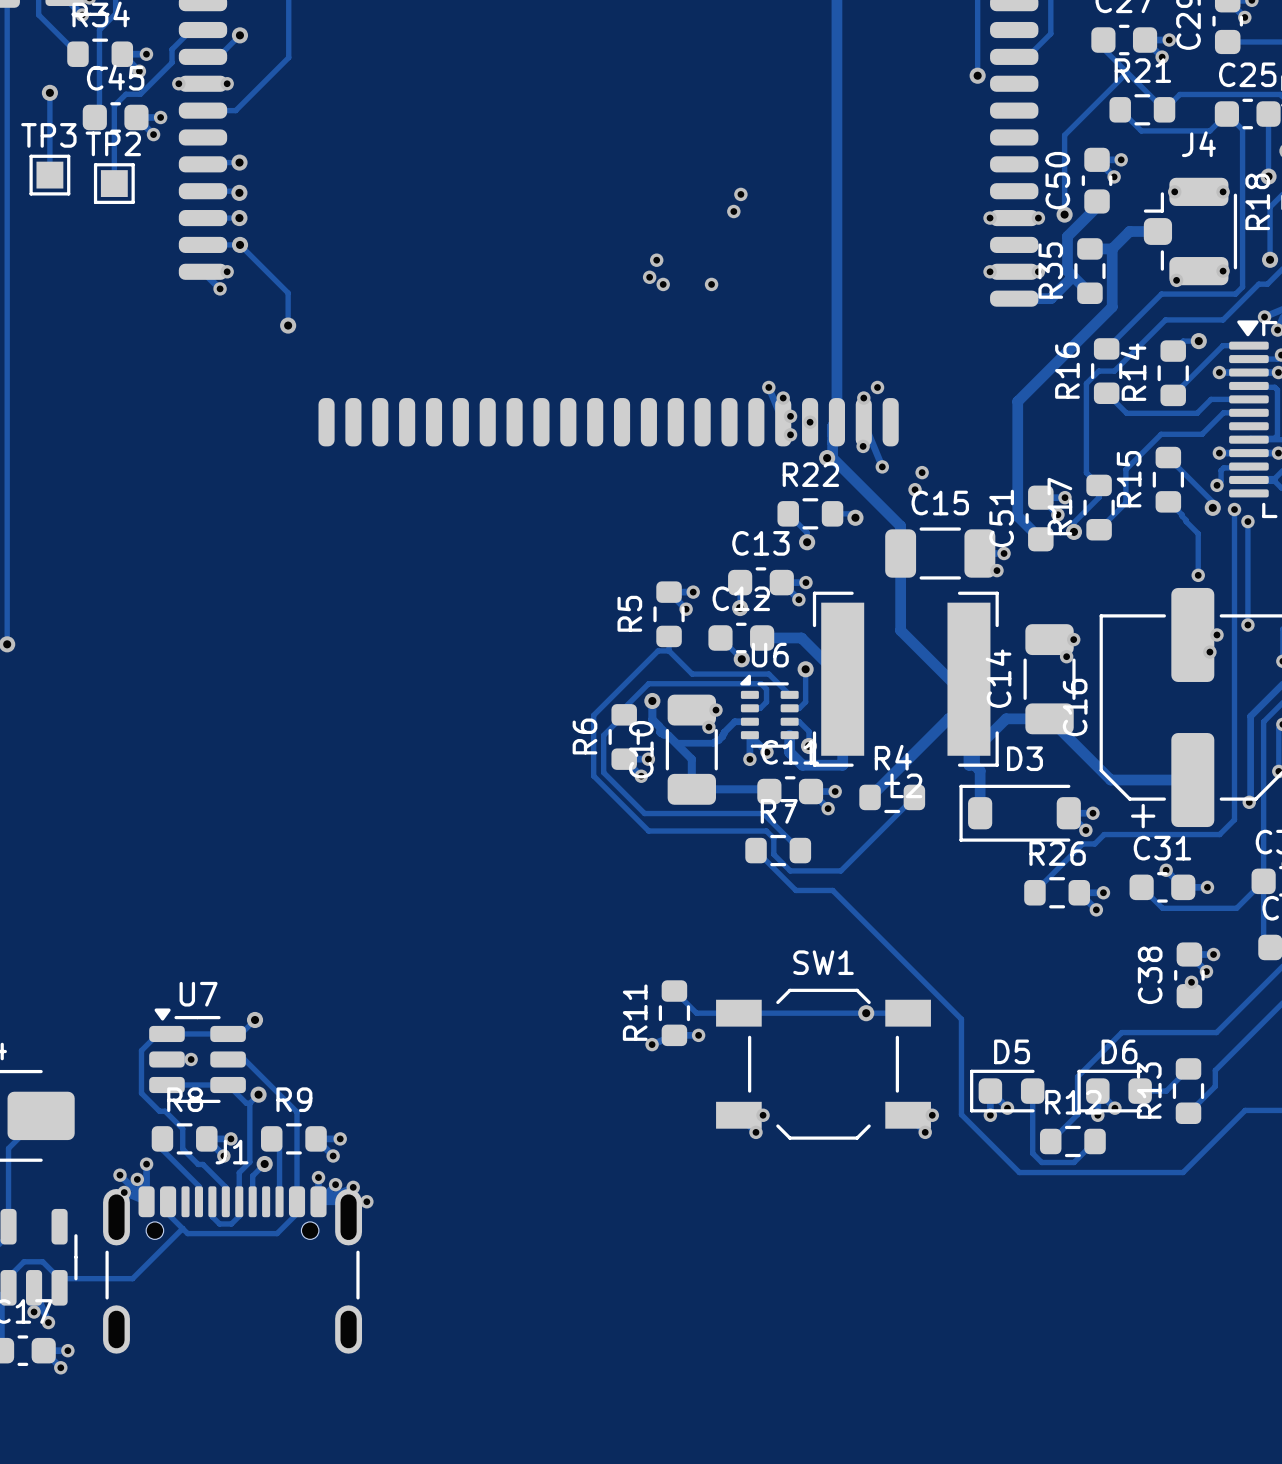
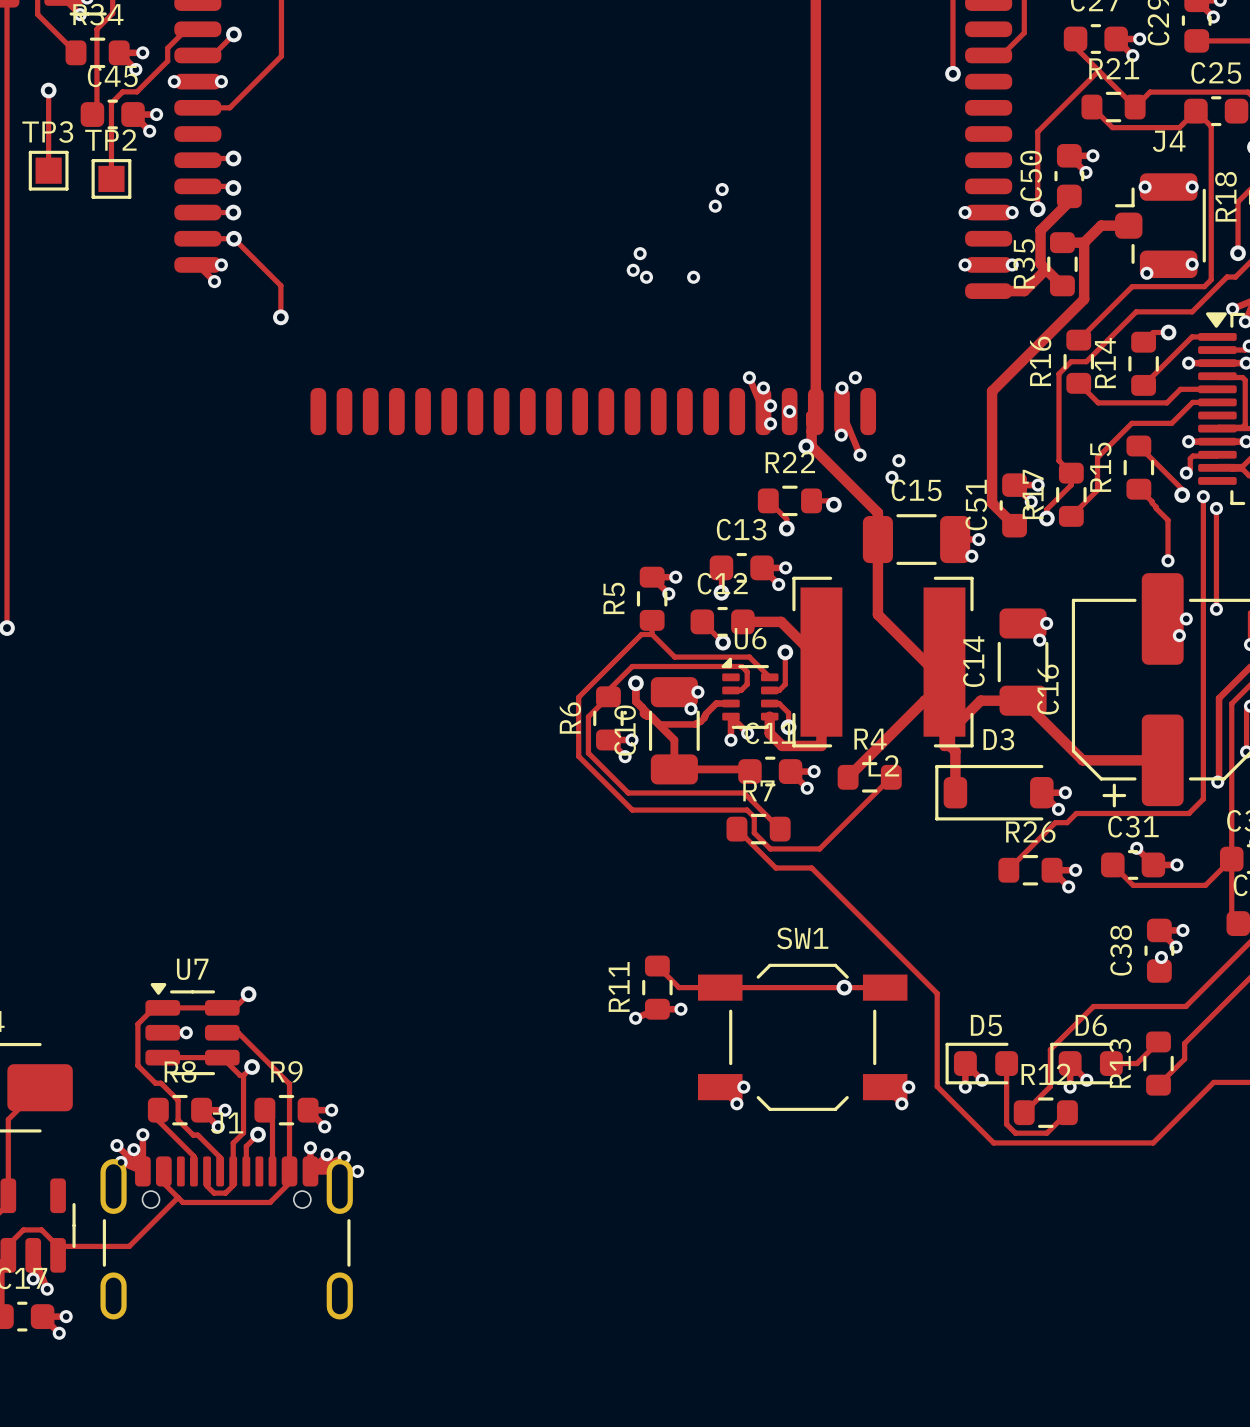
track: (1268, 114) (1268, 176) -> none
via: (1268, 176) -> none

